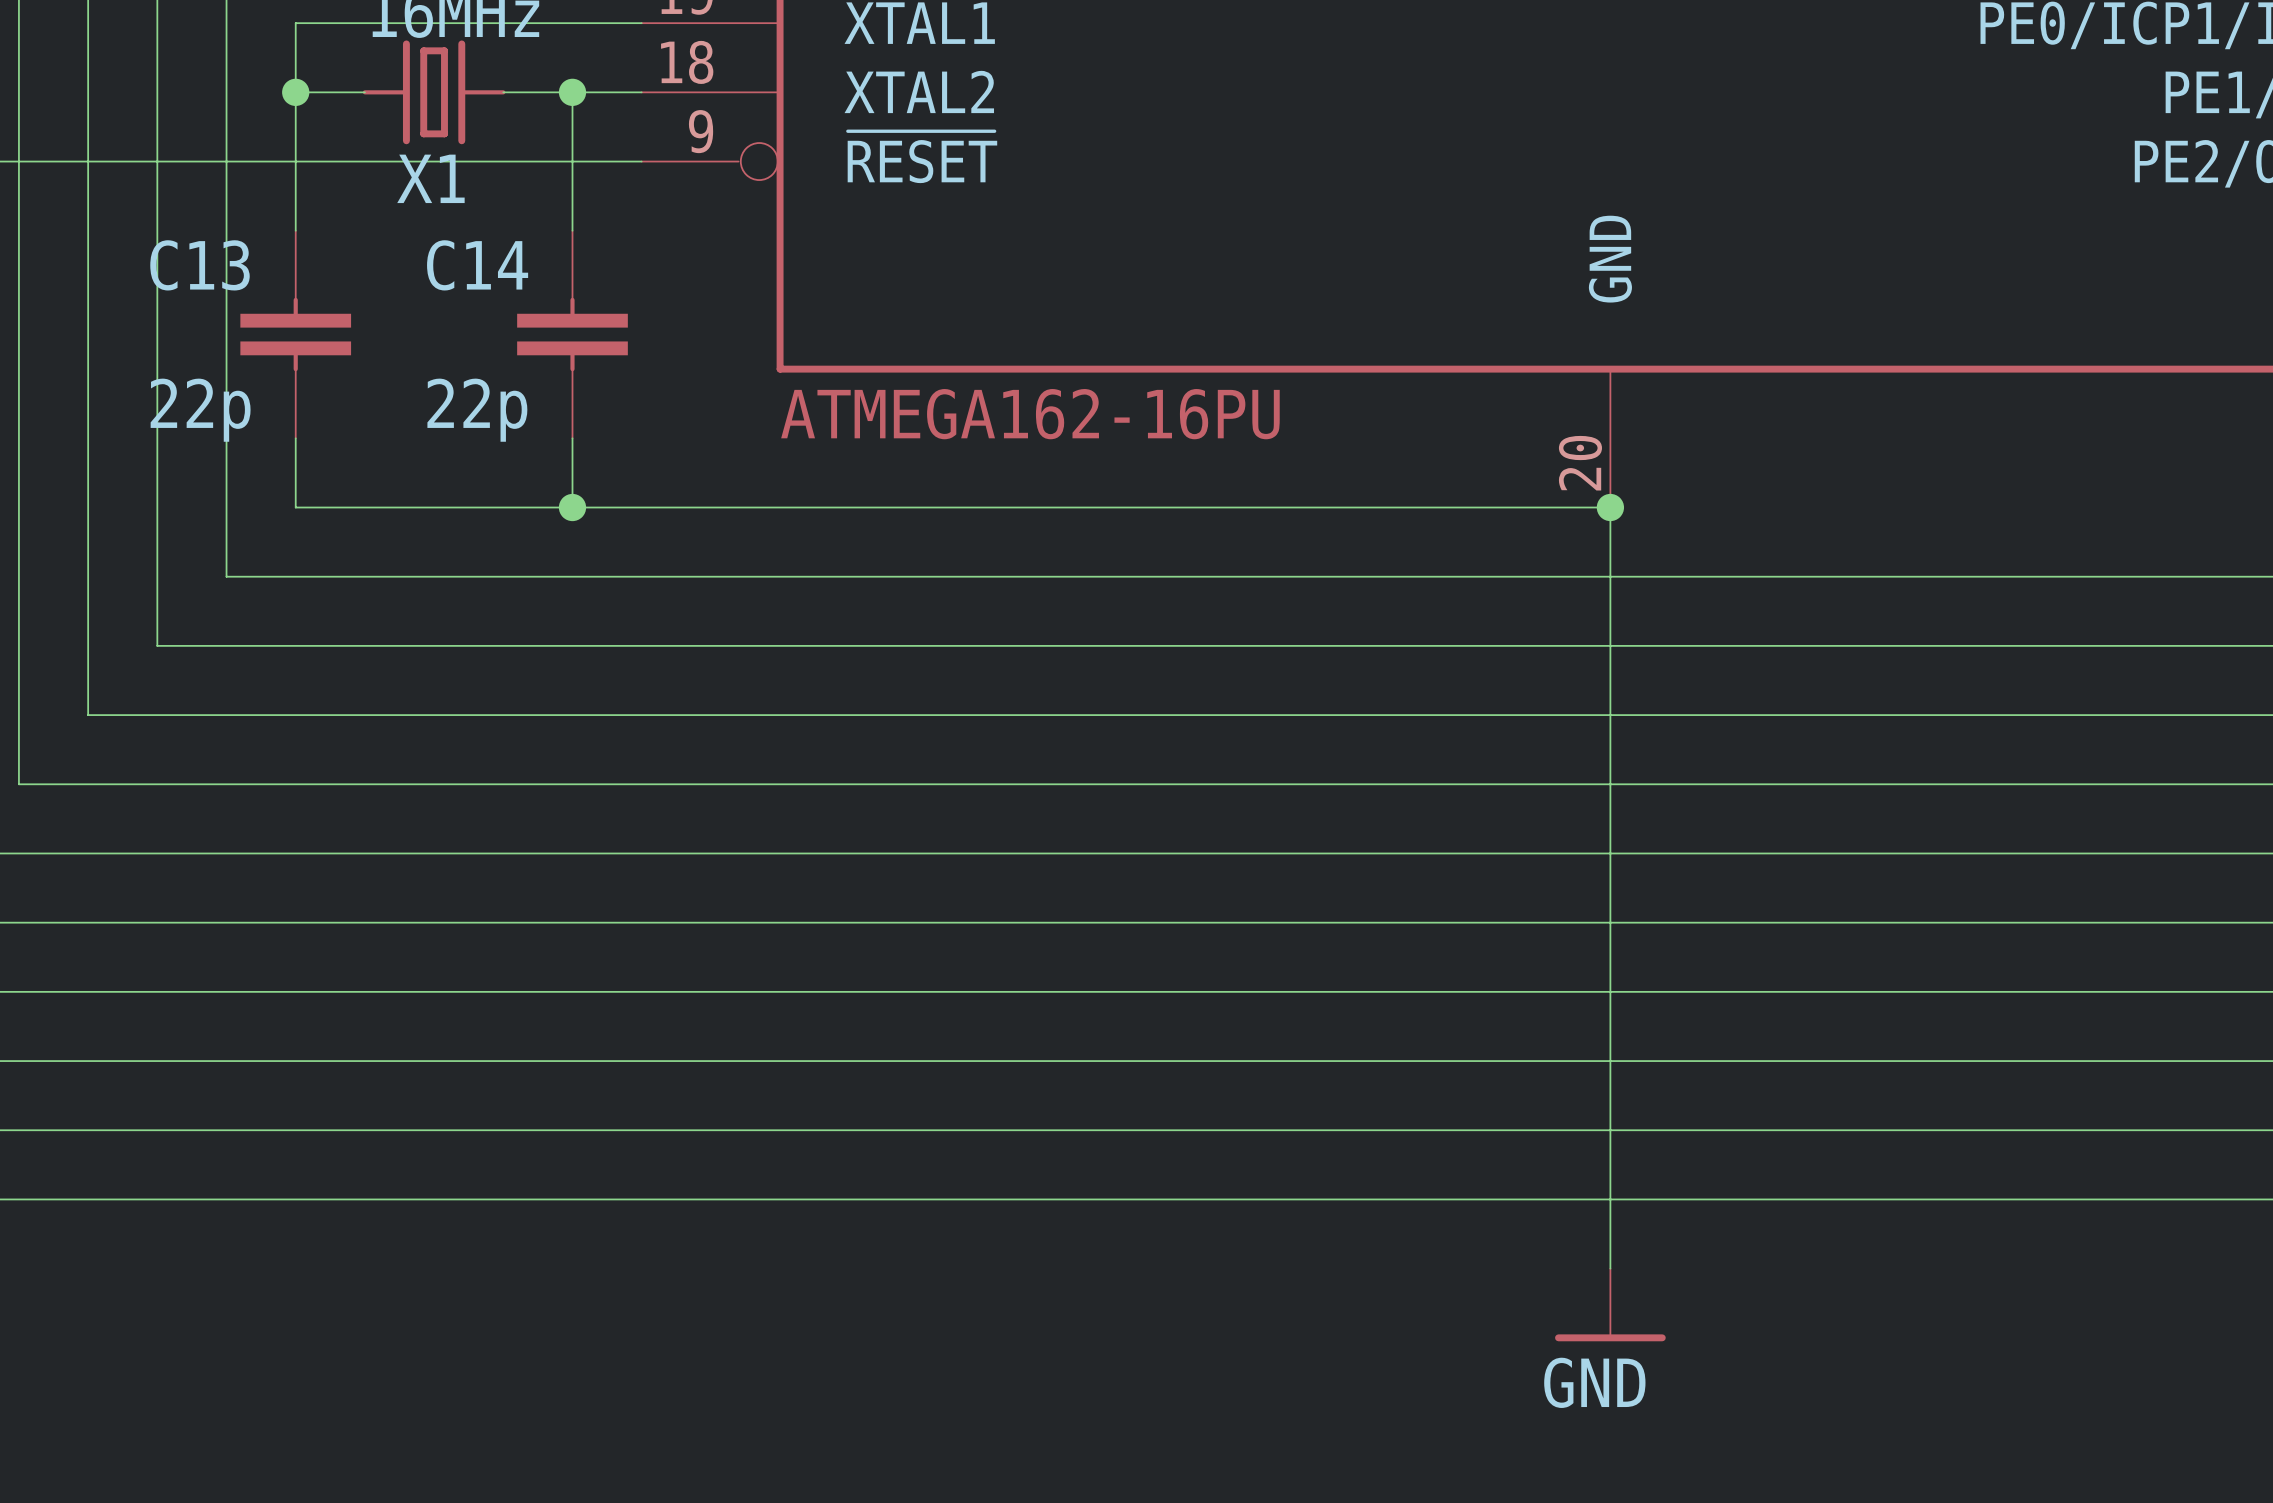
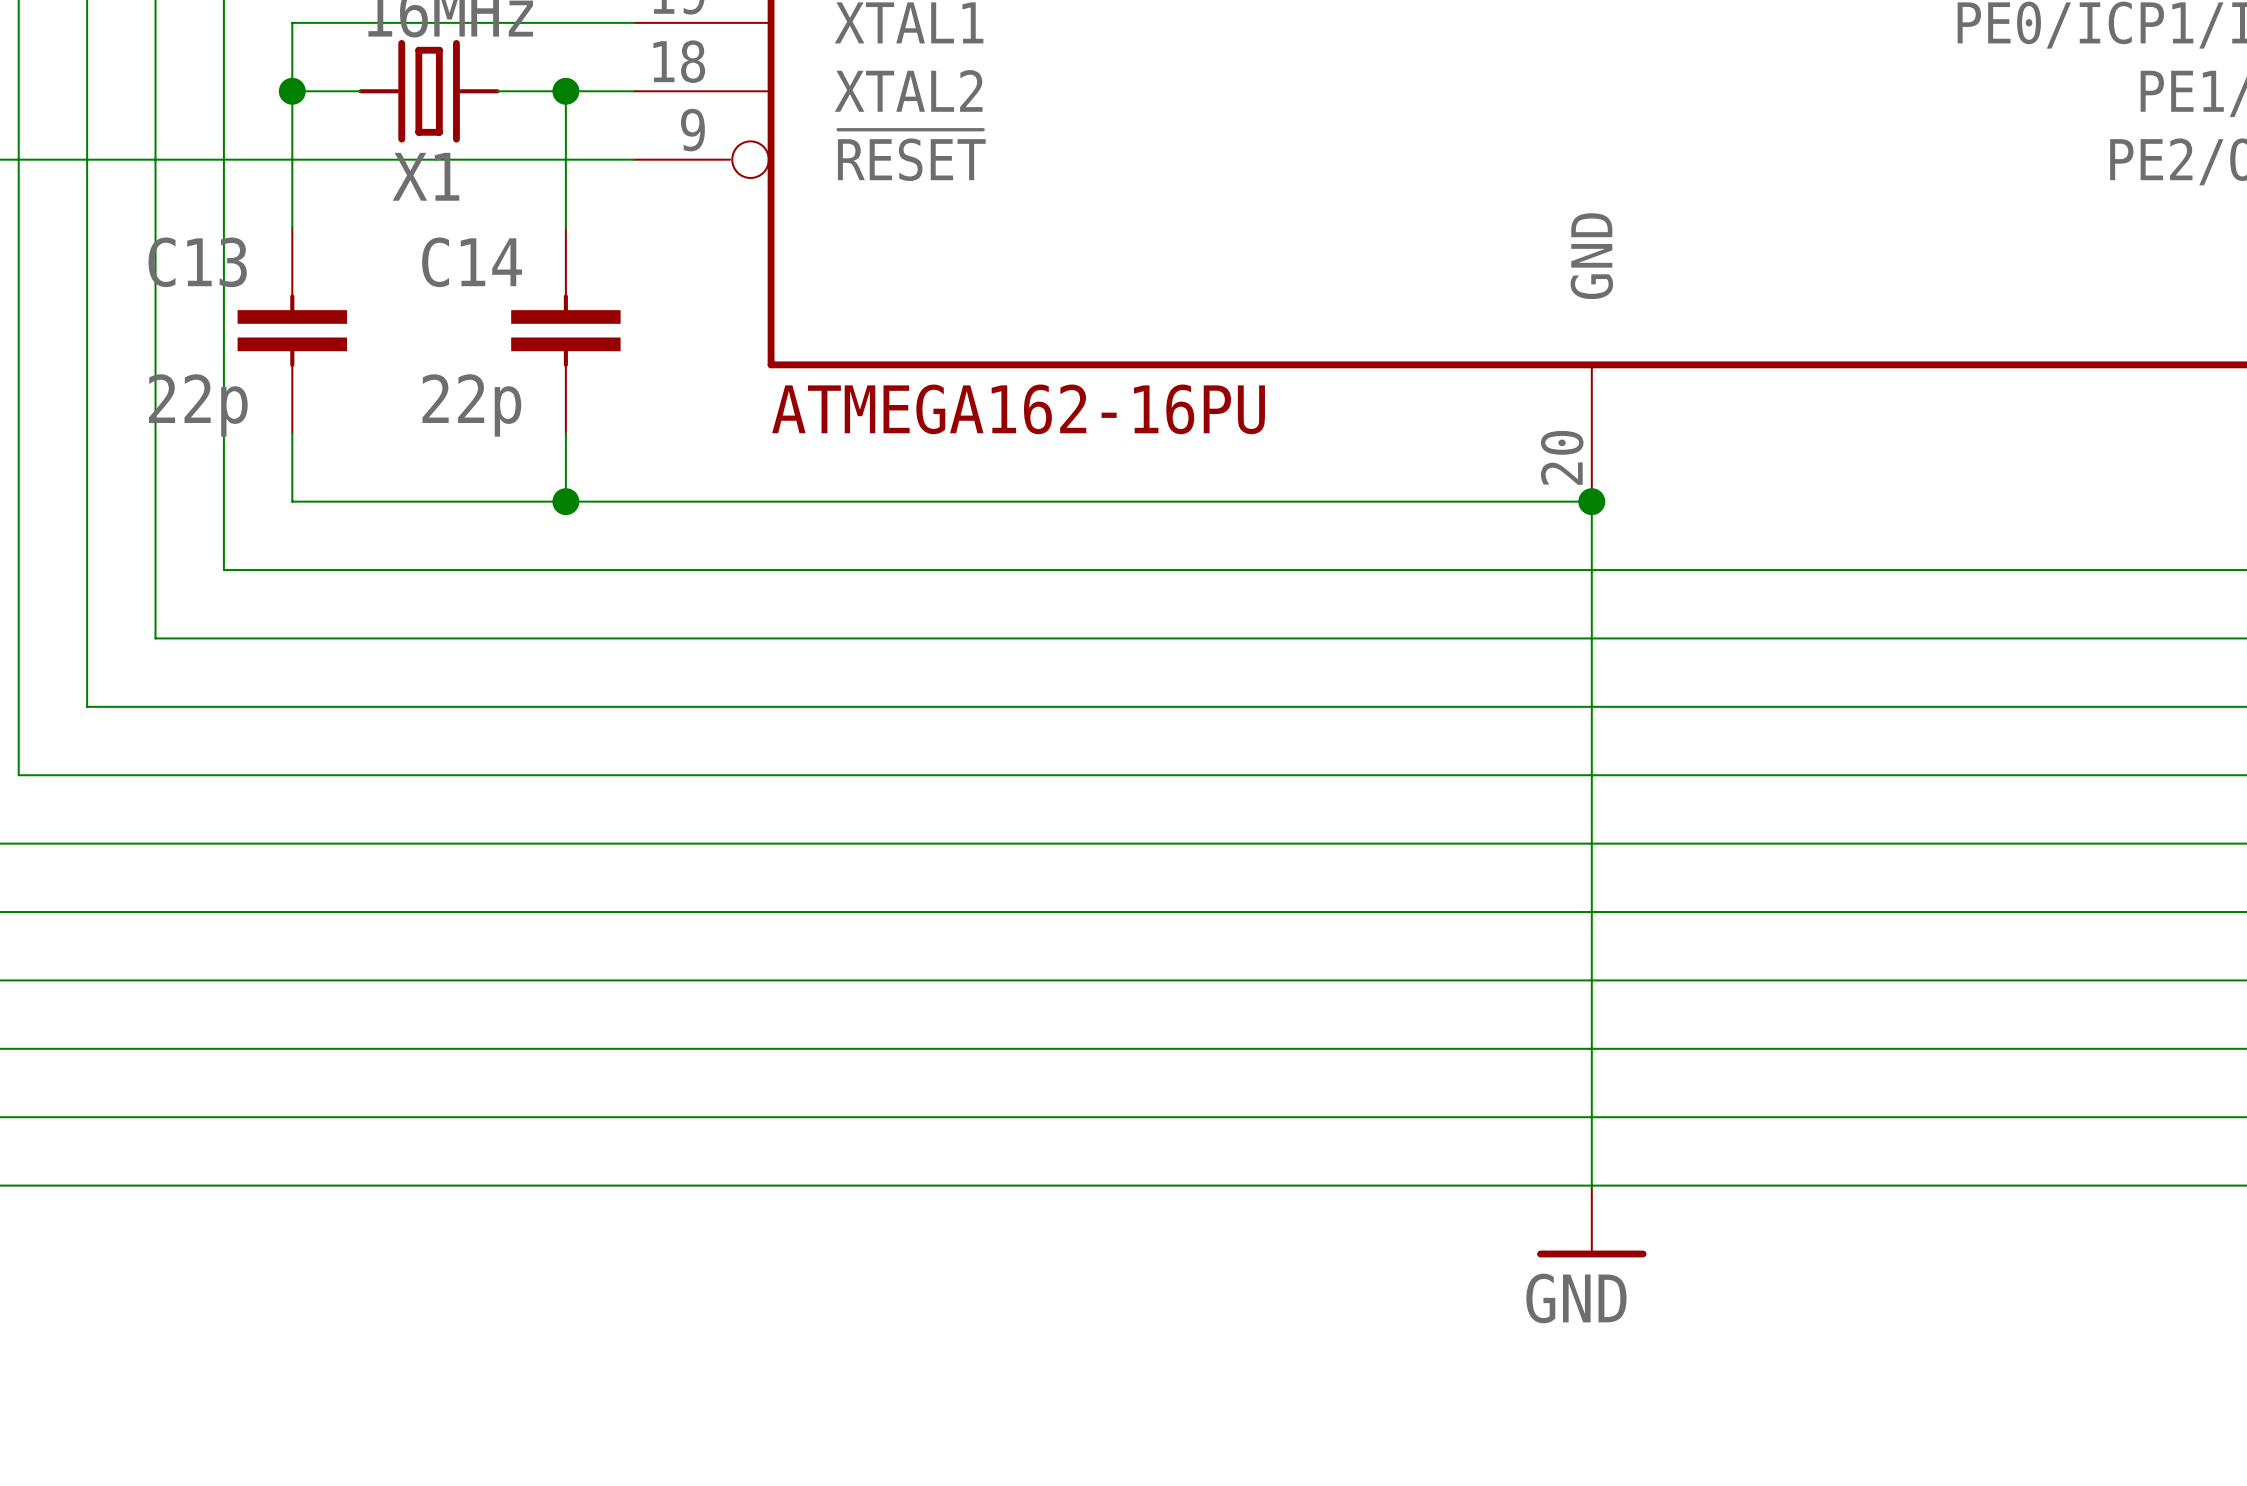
power symbol position: GND (1610, 1304) -> GND (1591, 1221)

